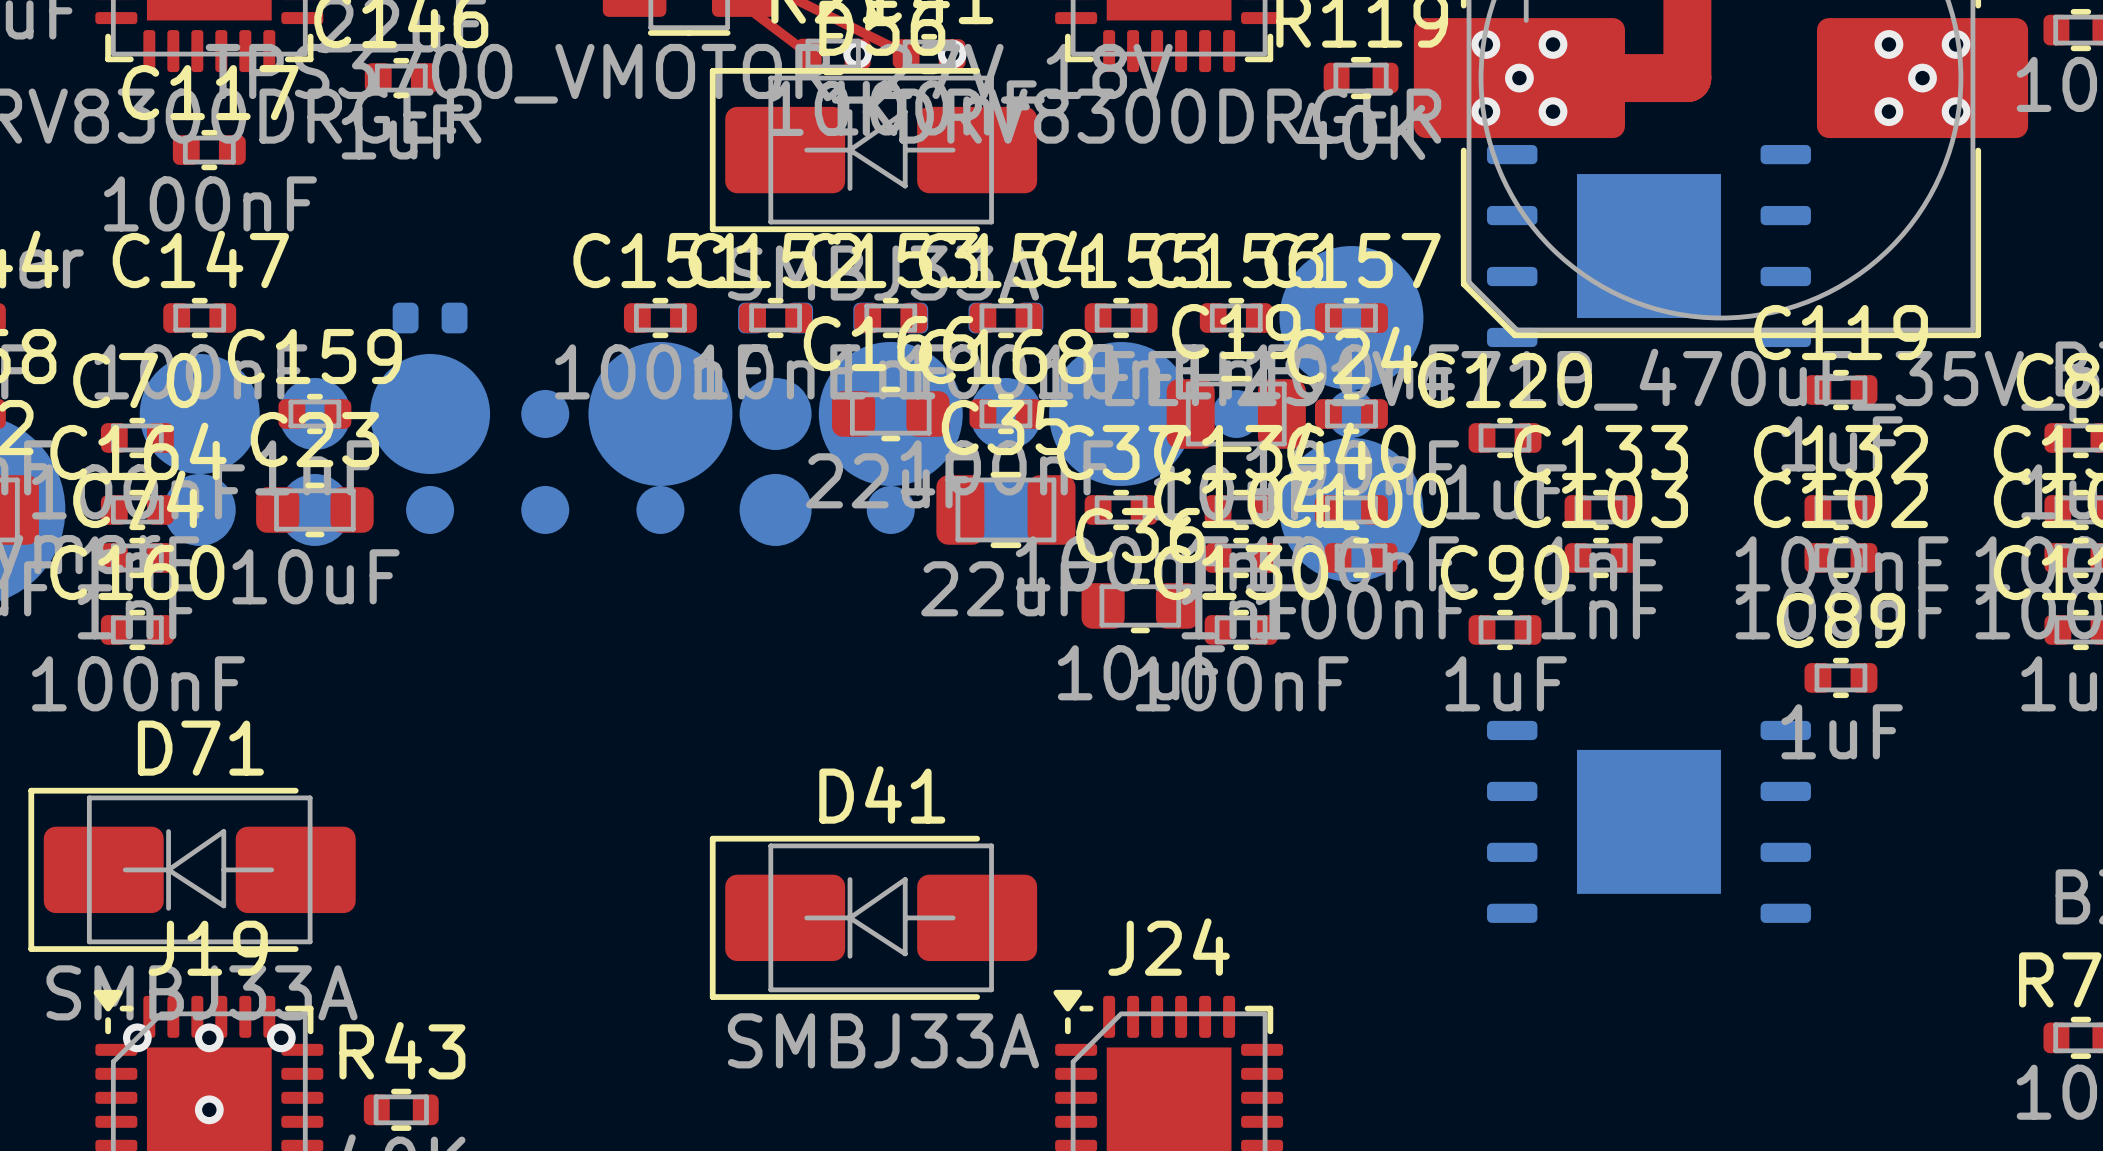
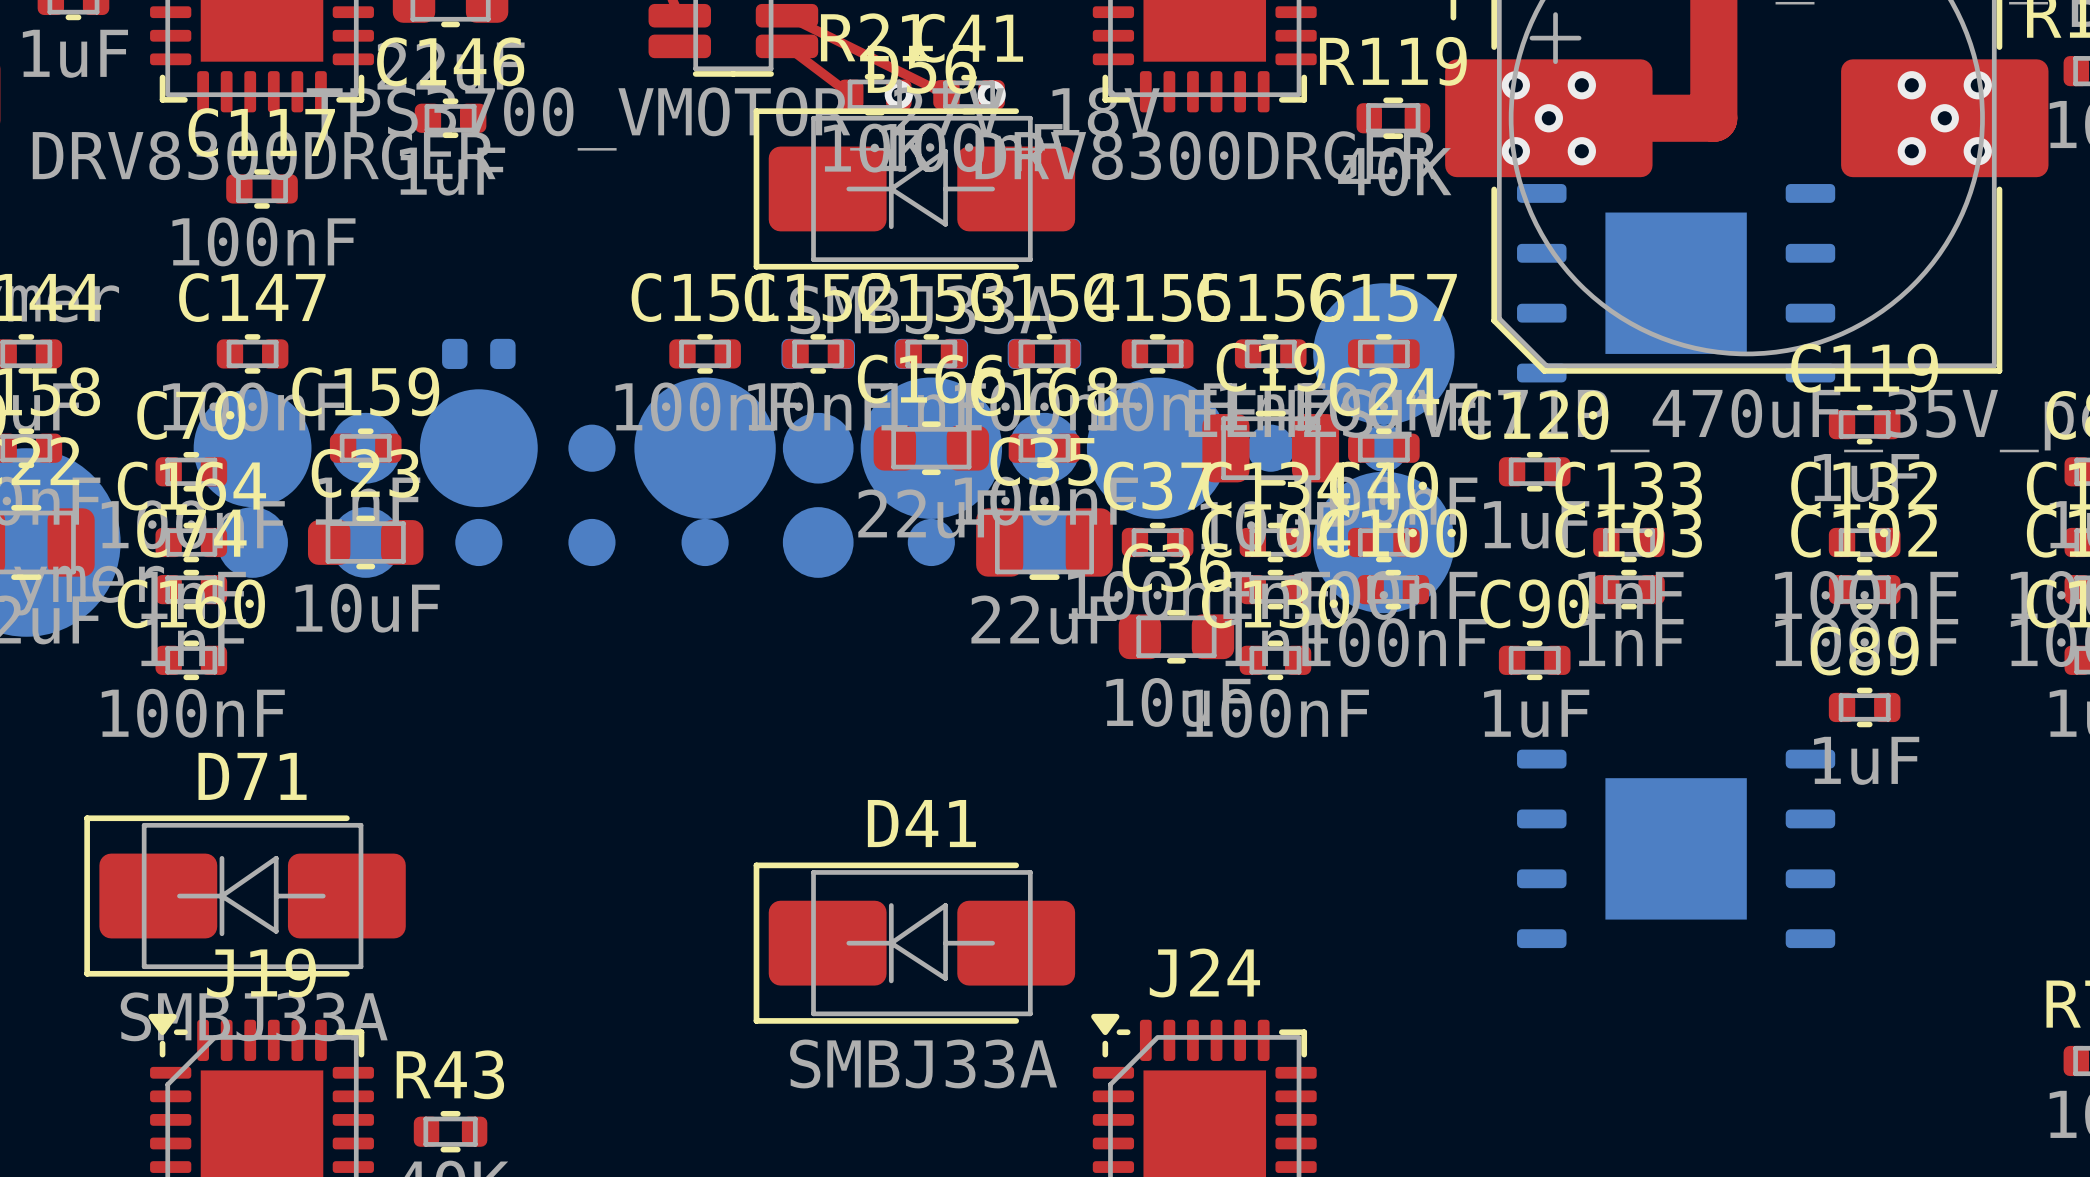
via: (137, 1037) -> none
via: (209, 1037) -> none
via: (281, 1037) -> none
via: (209, 1109) -> none

